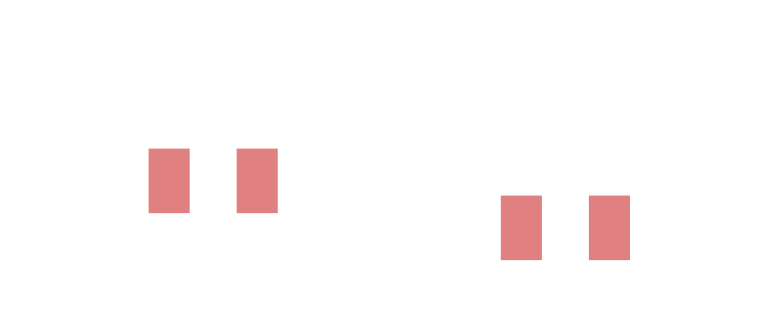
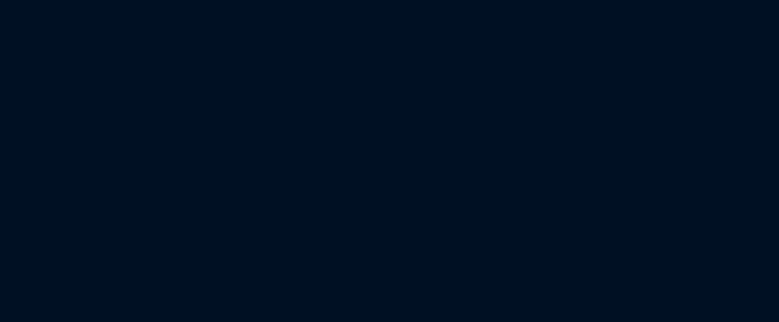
part: (213, 180) -> none
part: (565, 227) -> none

